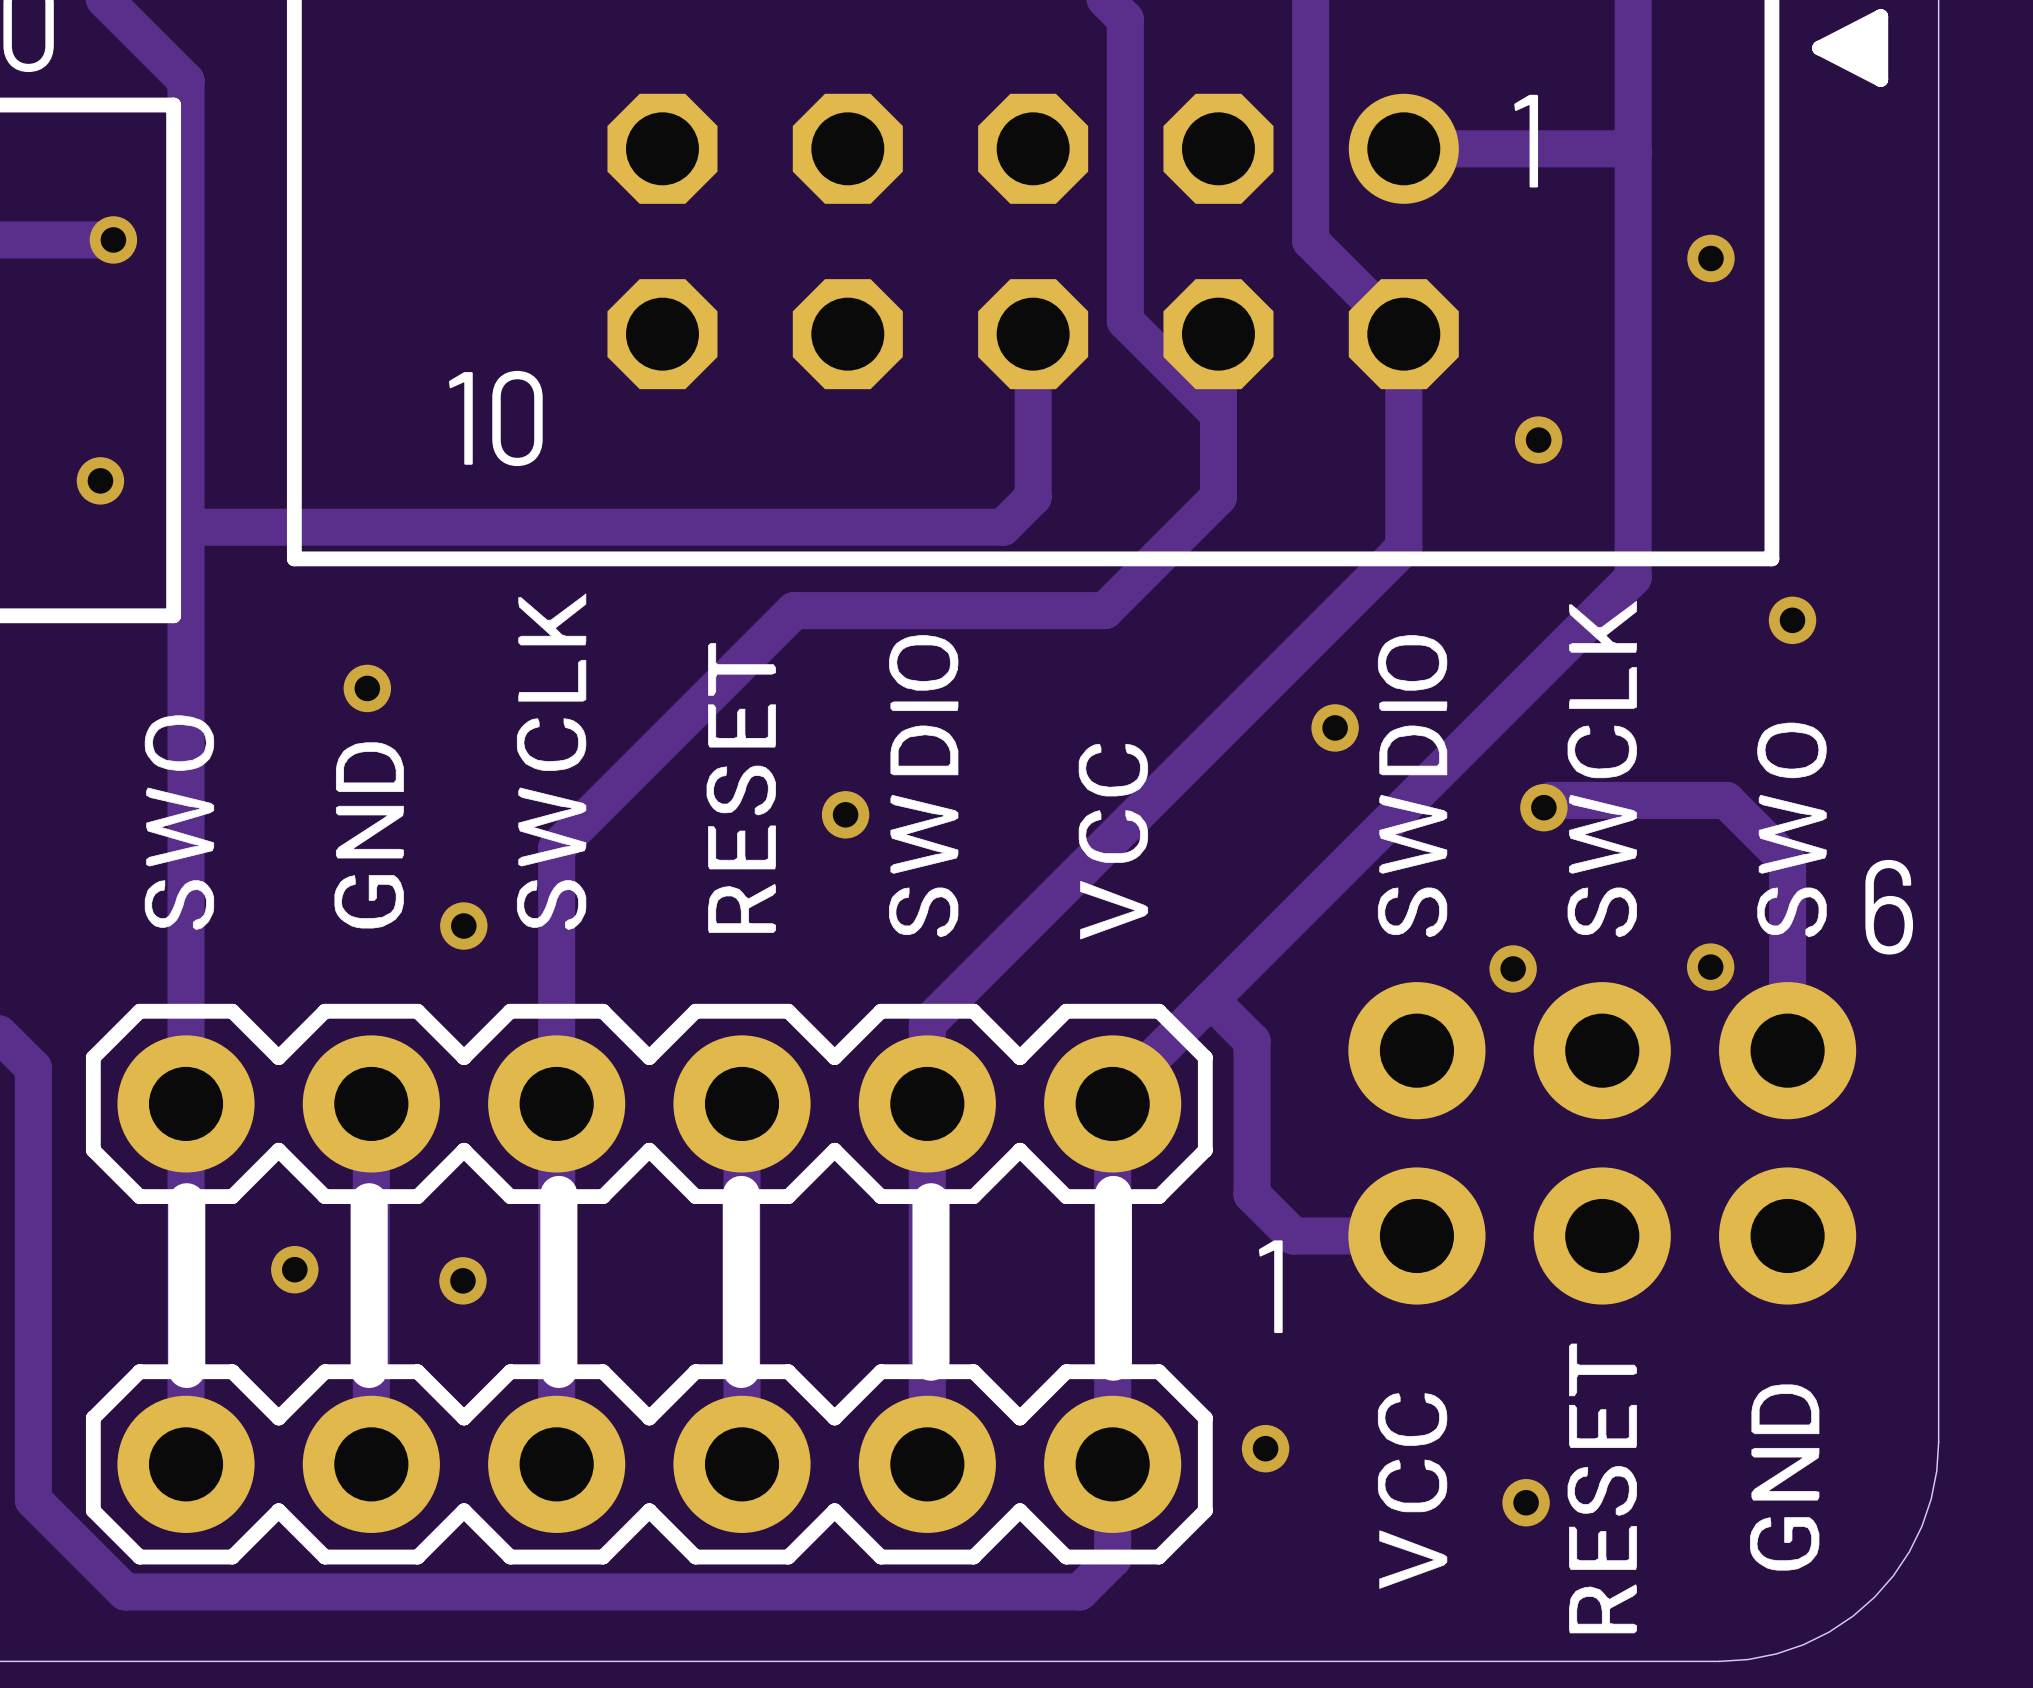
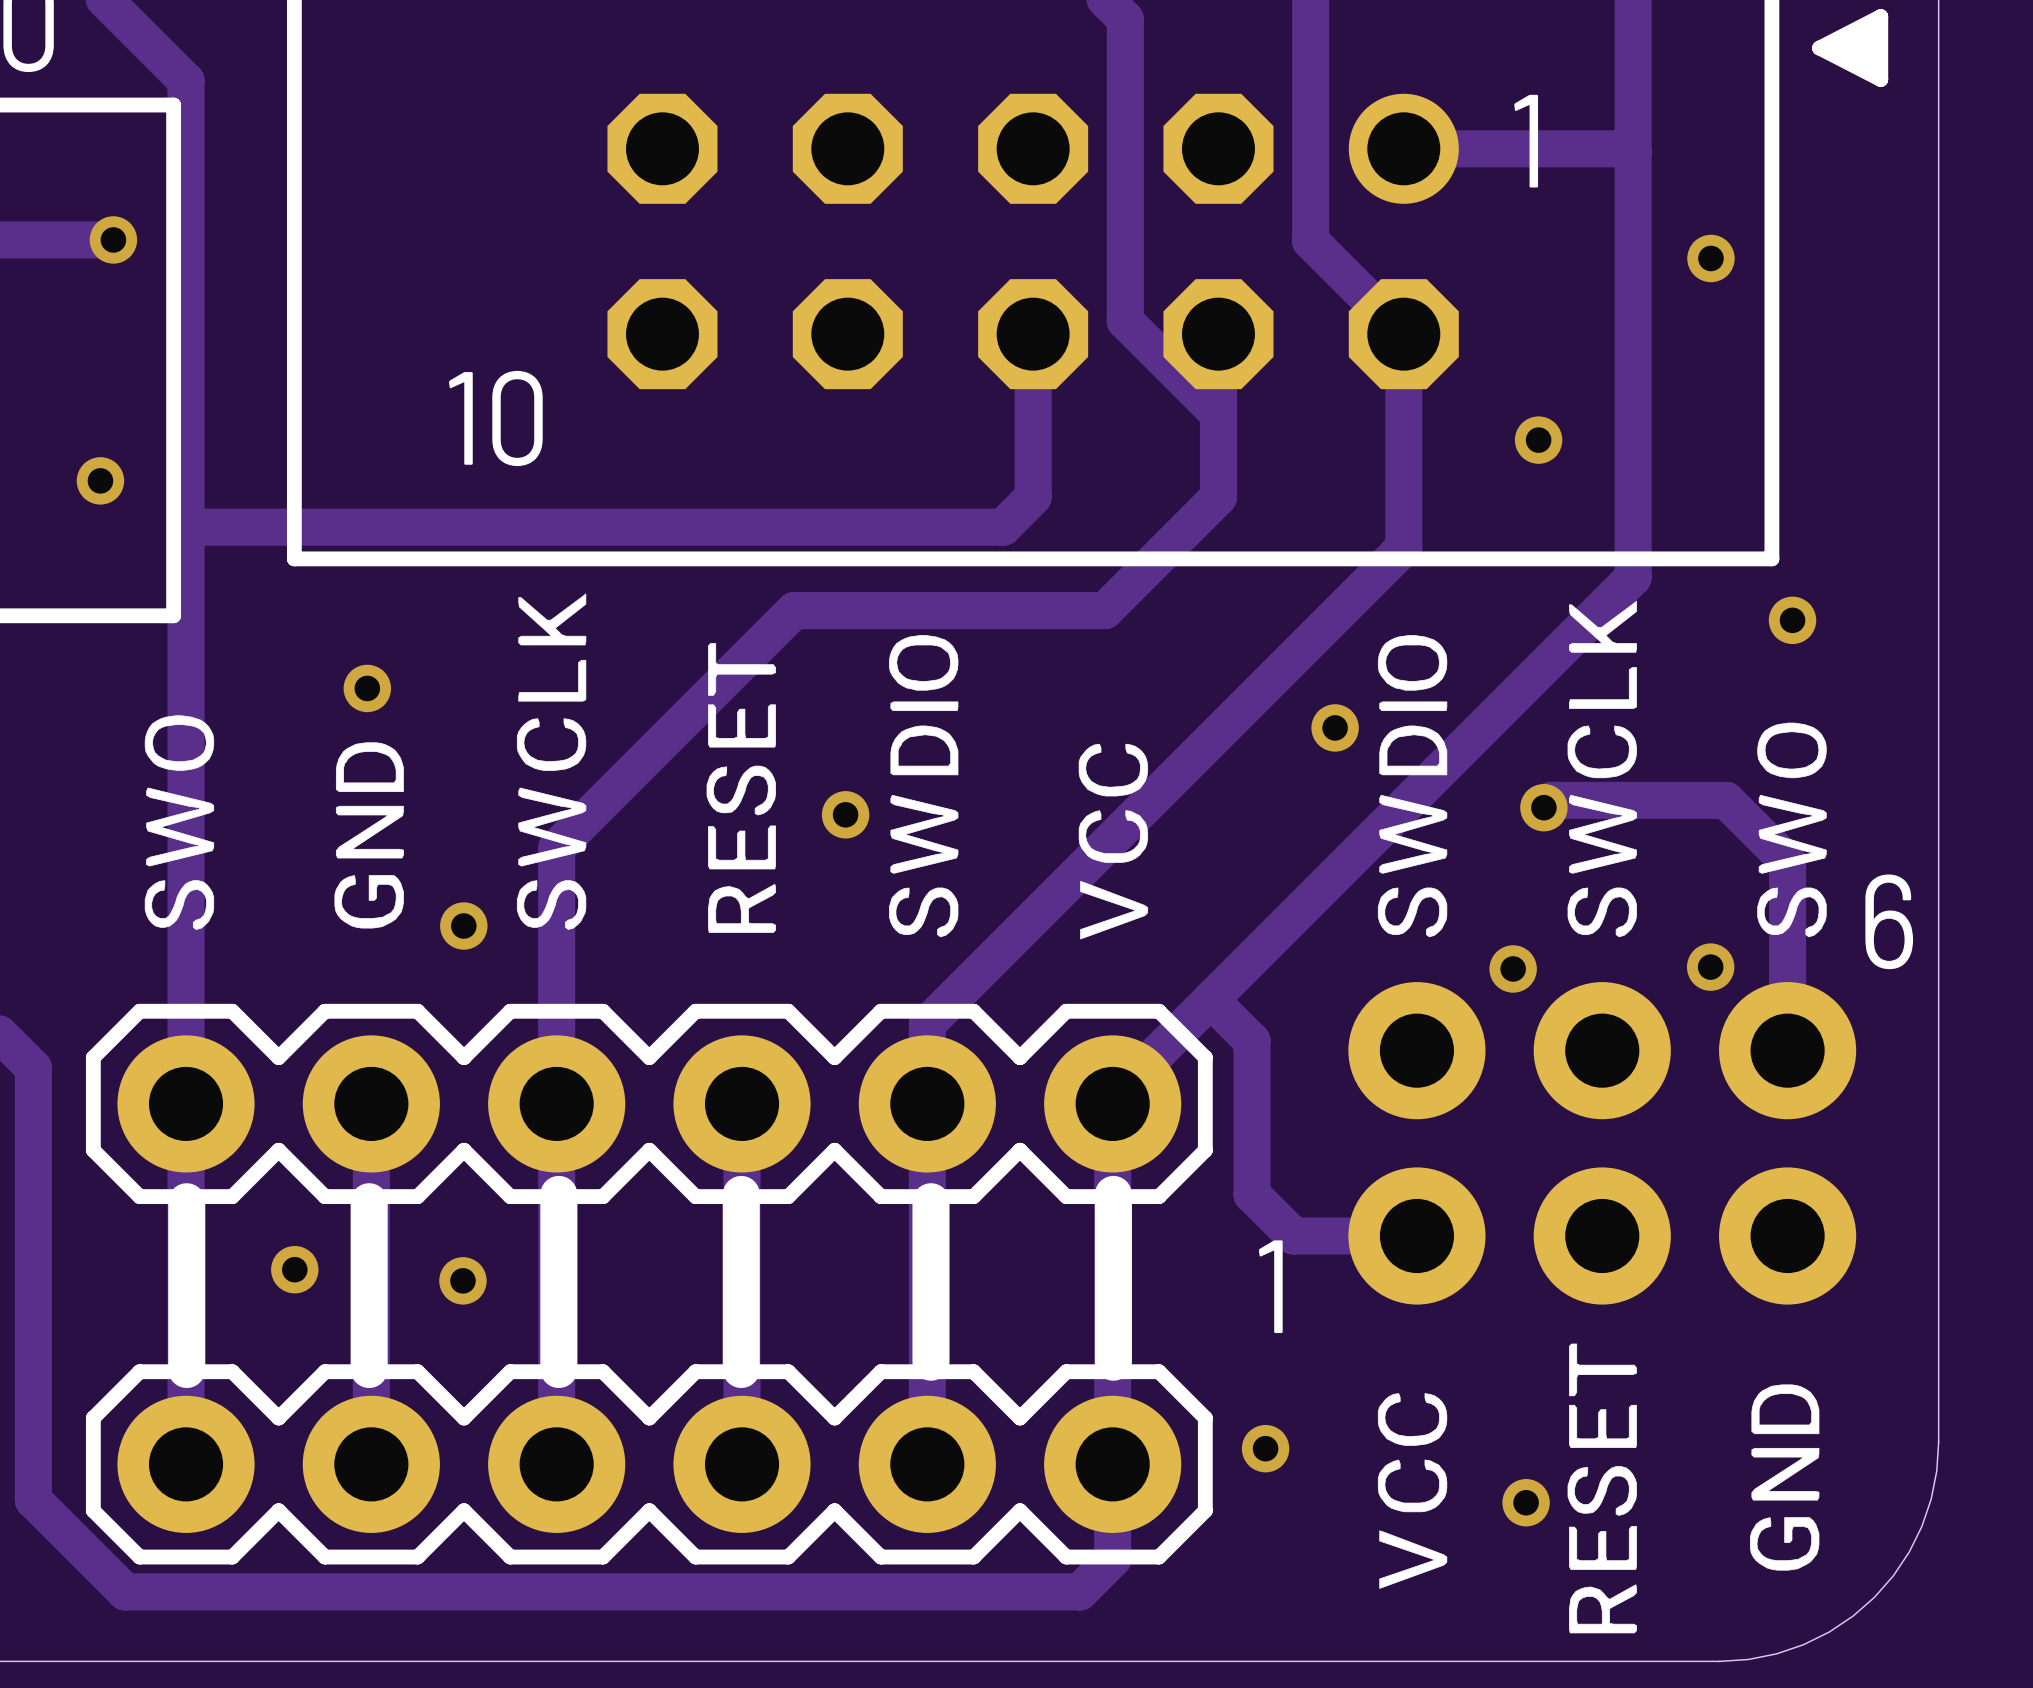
text position: 6 (1889, 907) -> 6 (1889, 921)

